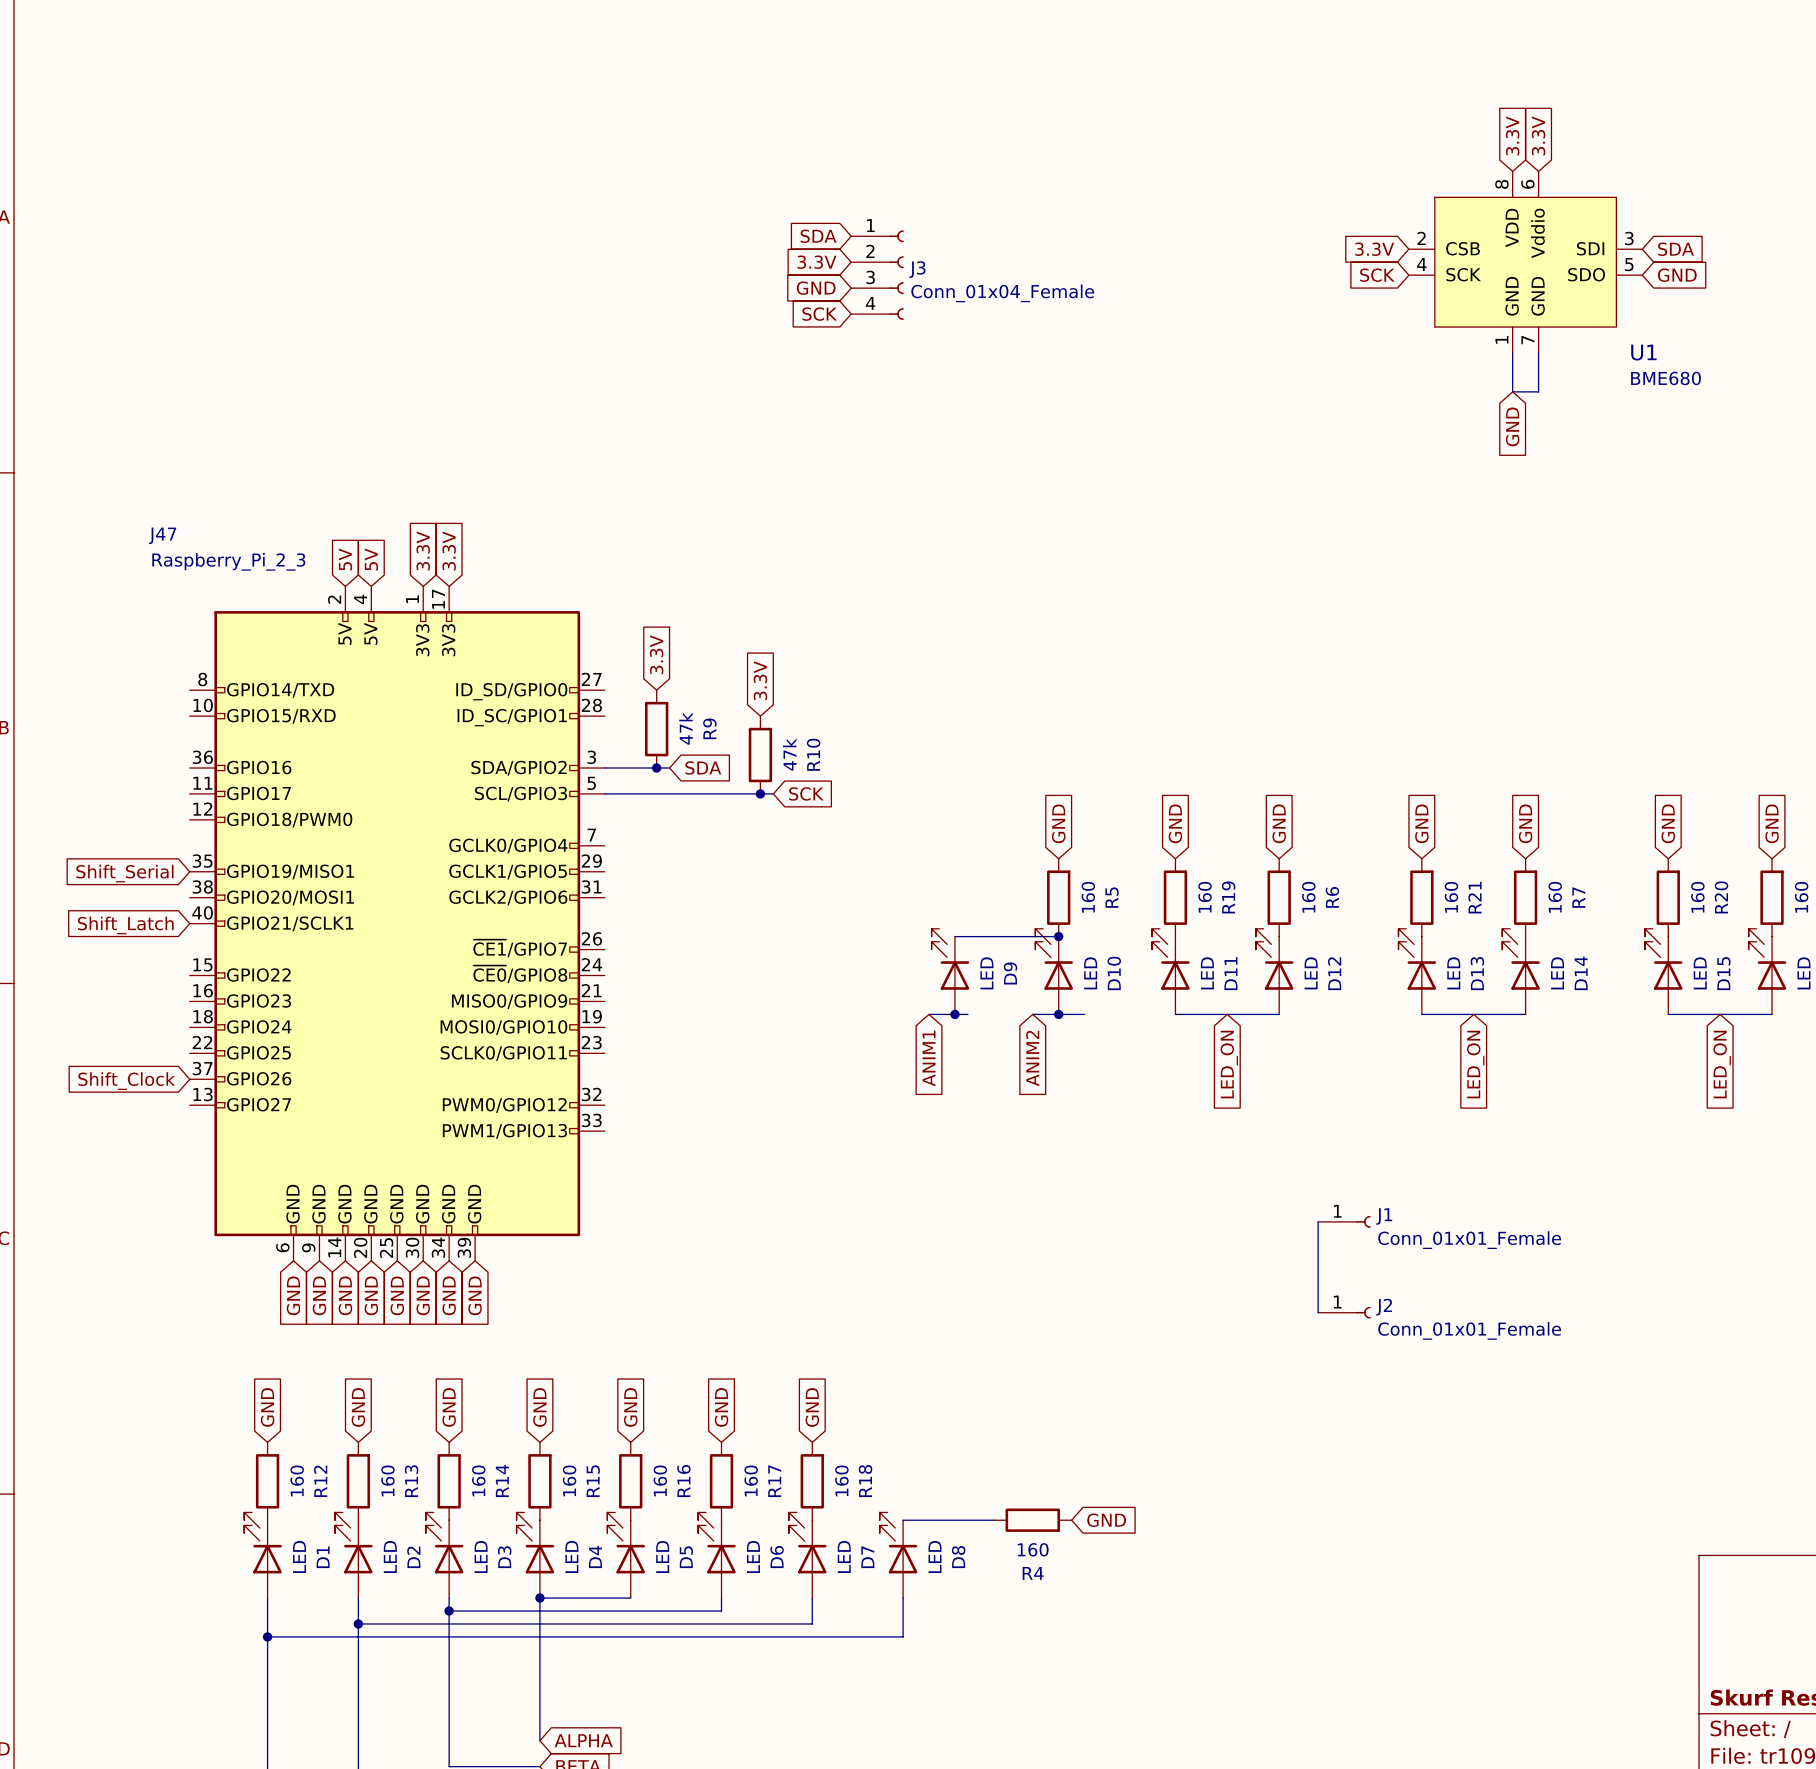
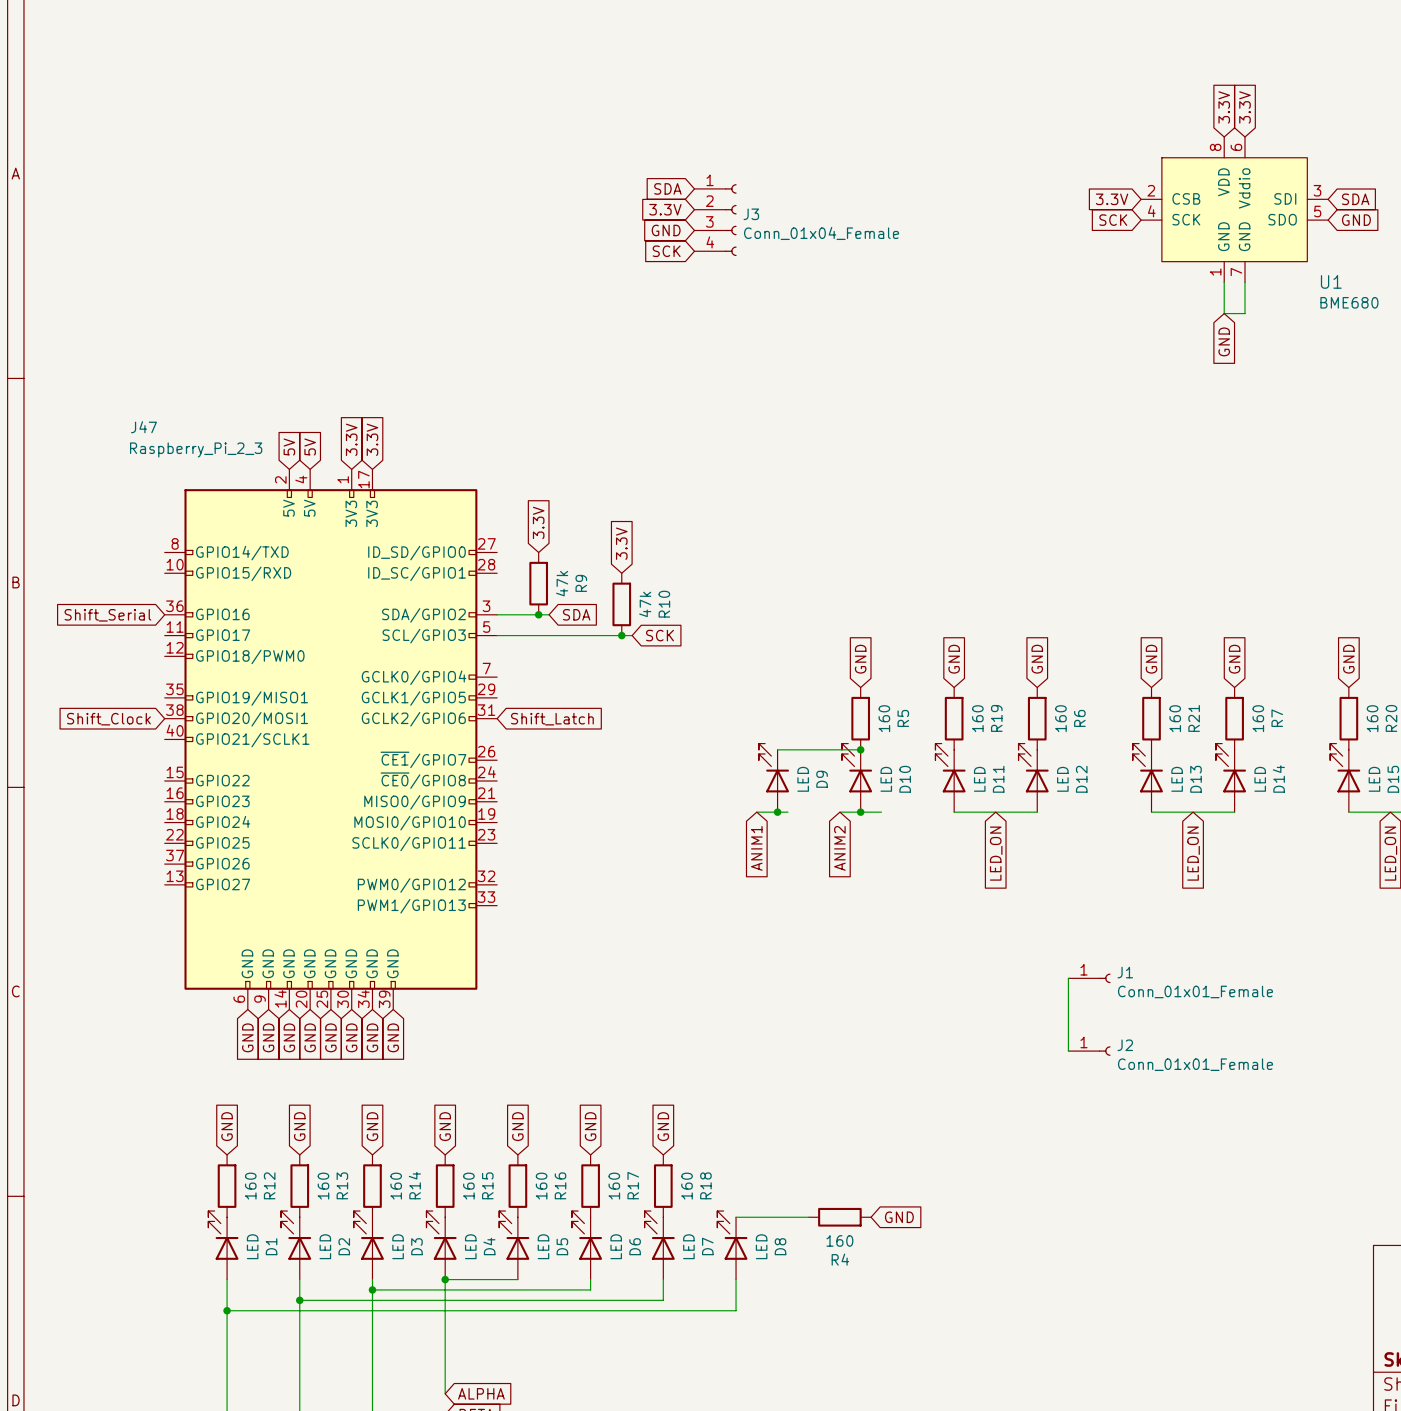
global label position: Shift_Serial (124, 873) -> Shift_Serial (107, 615)
global label: none -> Shift_Latch (552, 719)
global label: Shift_Latch (125, 925) -> none
global label position: Shift_Clock (126, 1081) -> Shift_Clock (108, 719)

